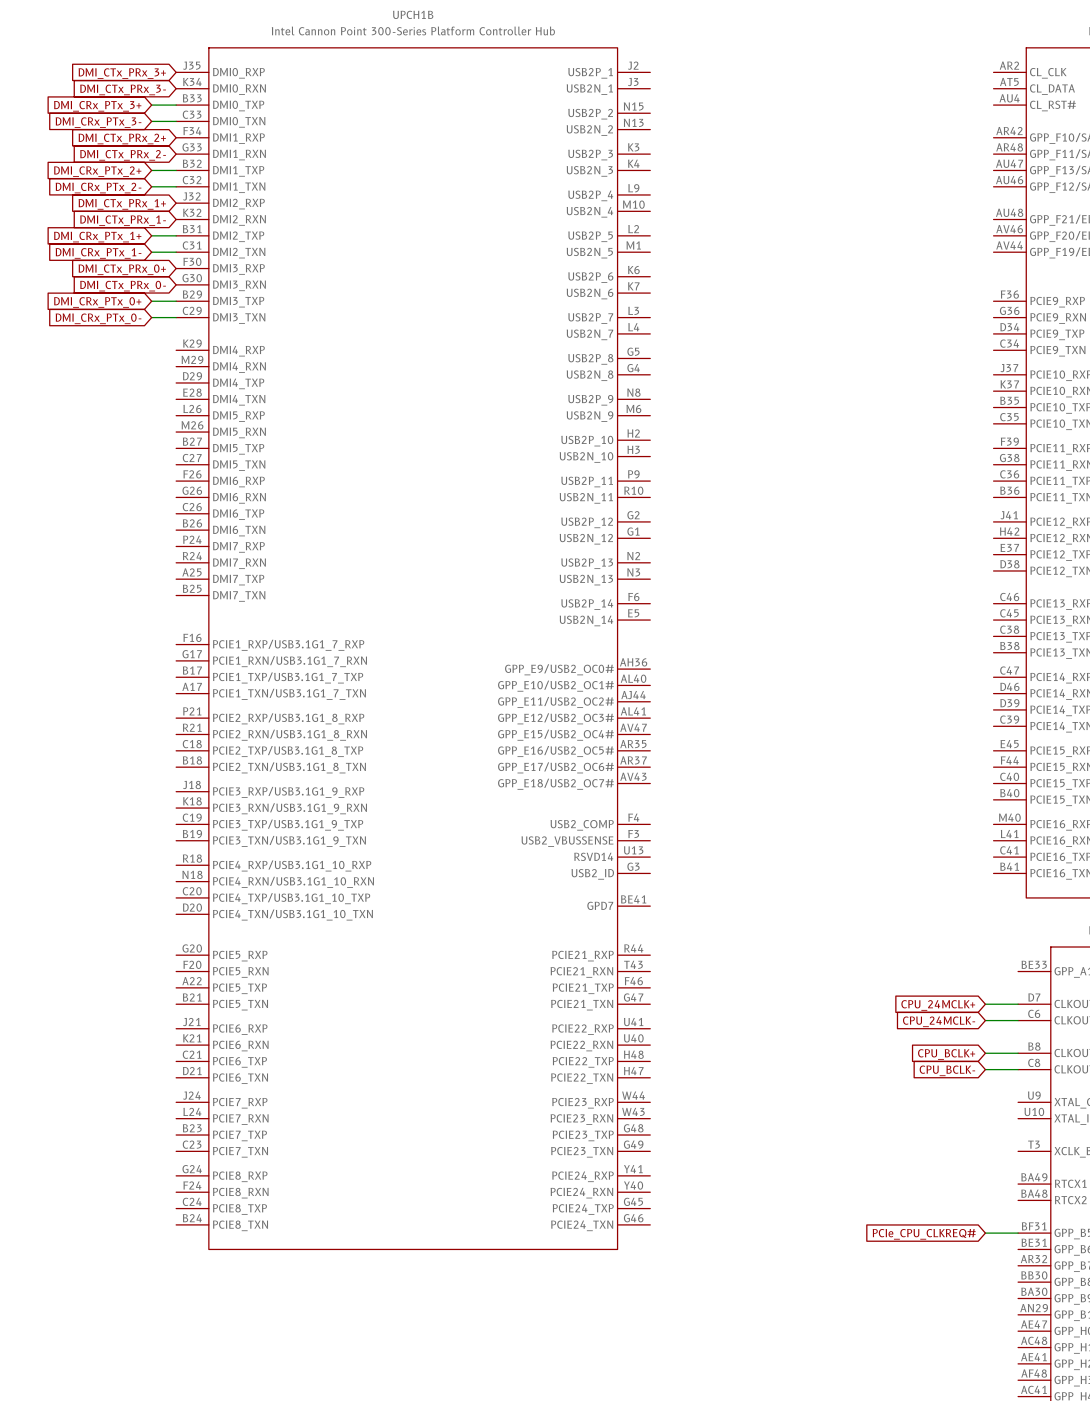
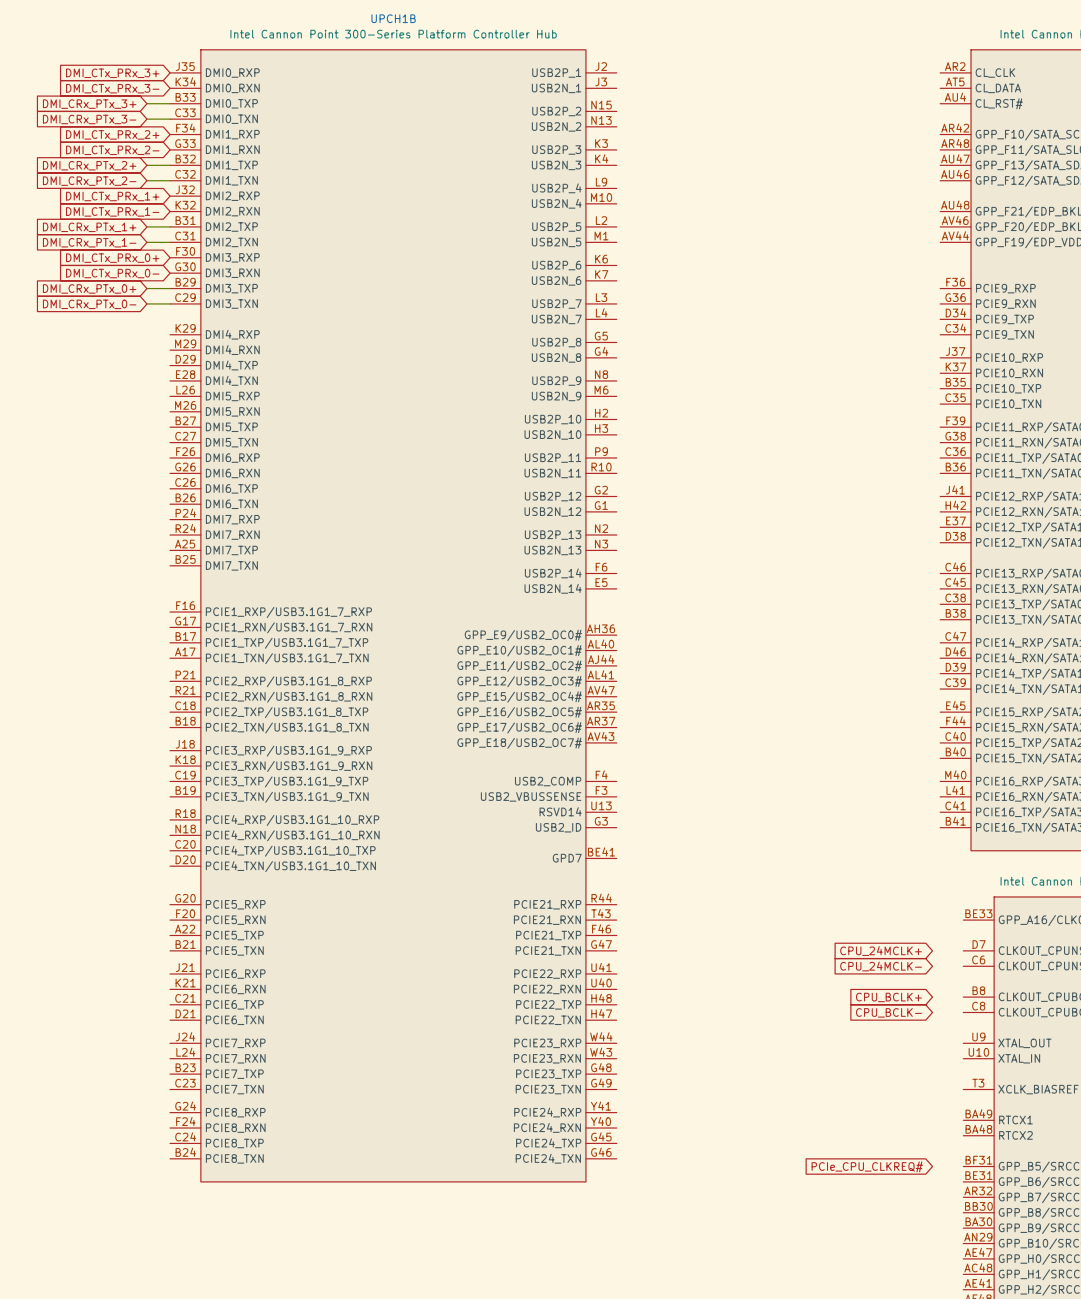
wire: (985, 1004) (1018, 1004) -> none
wire: (985, 1020) (1018, 1020) -> none
wire: (985, 1053) (1018, 1053) -> none
wire: (985, 1069) (1018, 1069) -> none
wire: (985, 1233) (1018, 1233) -> none

